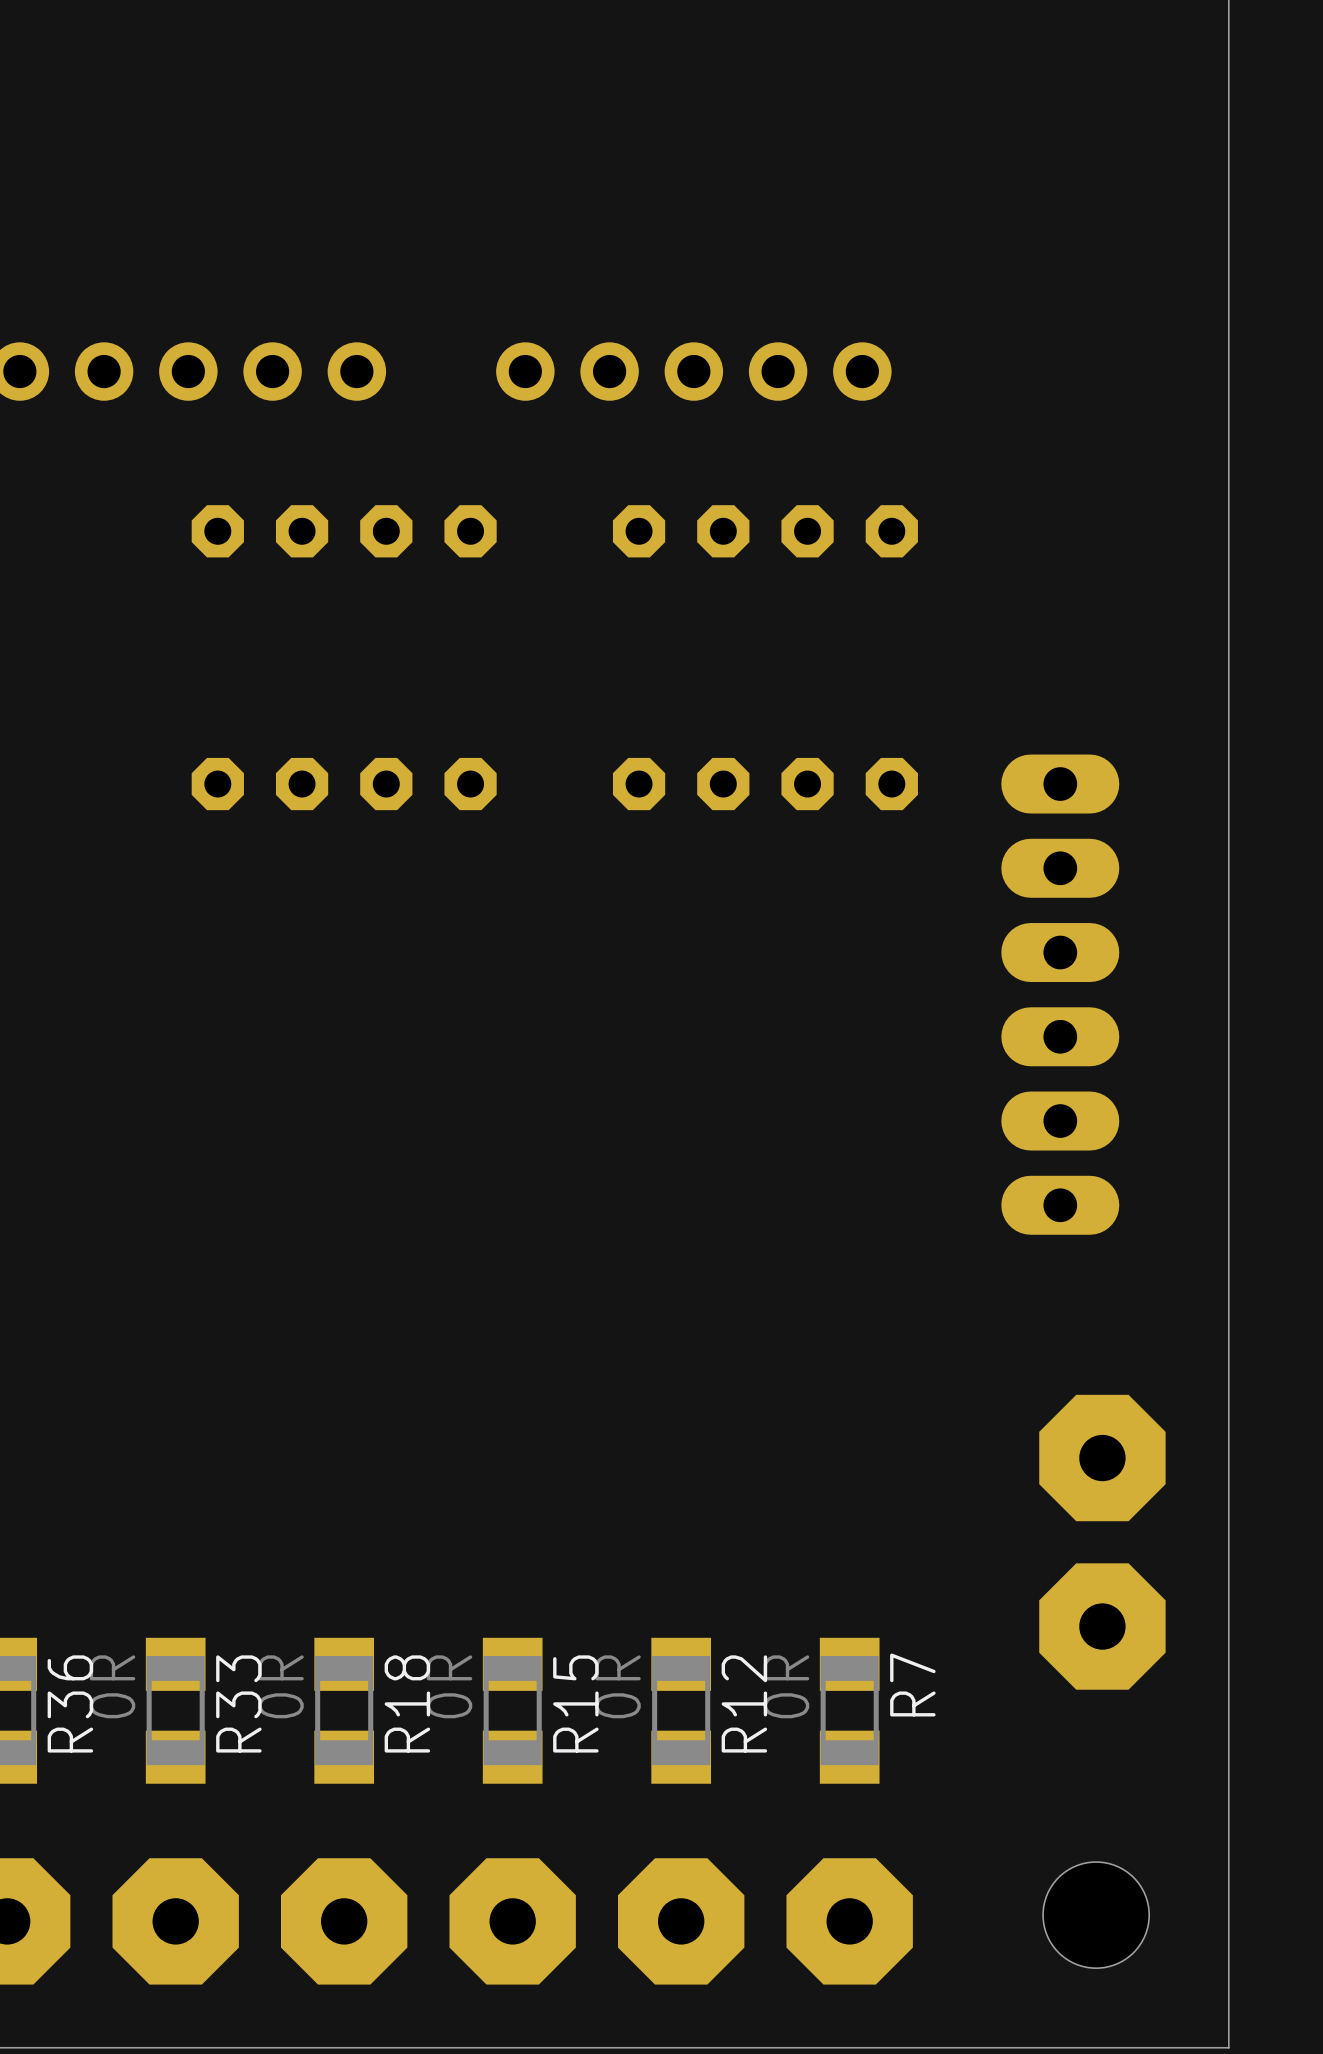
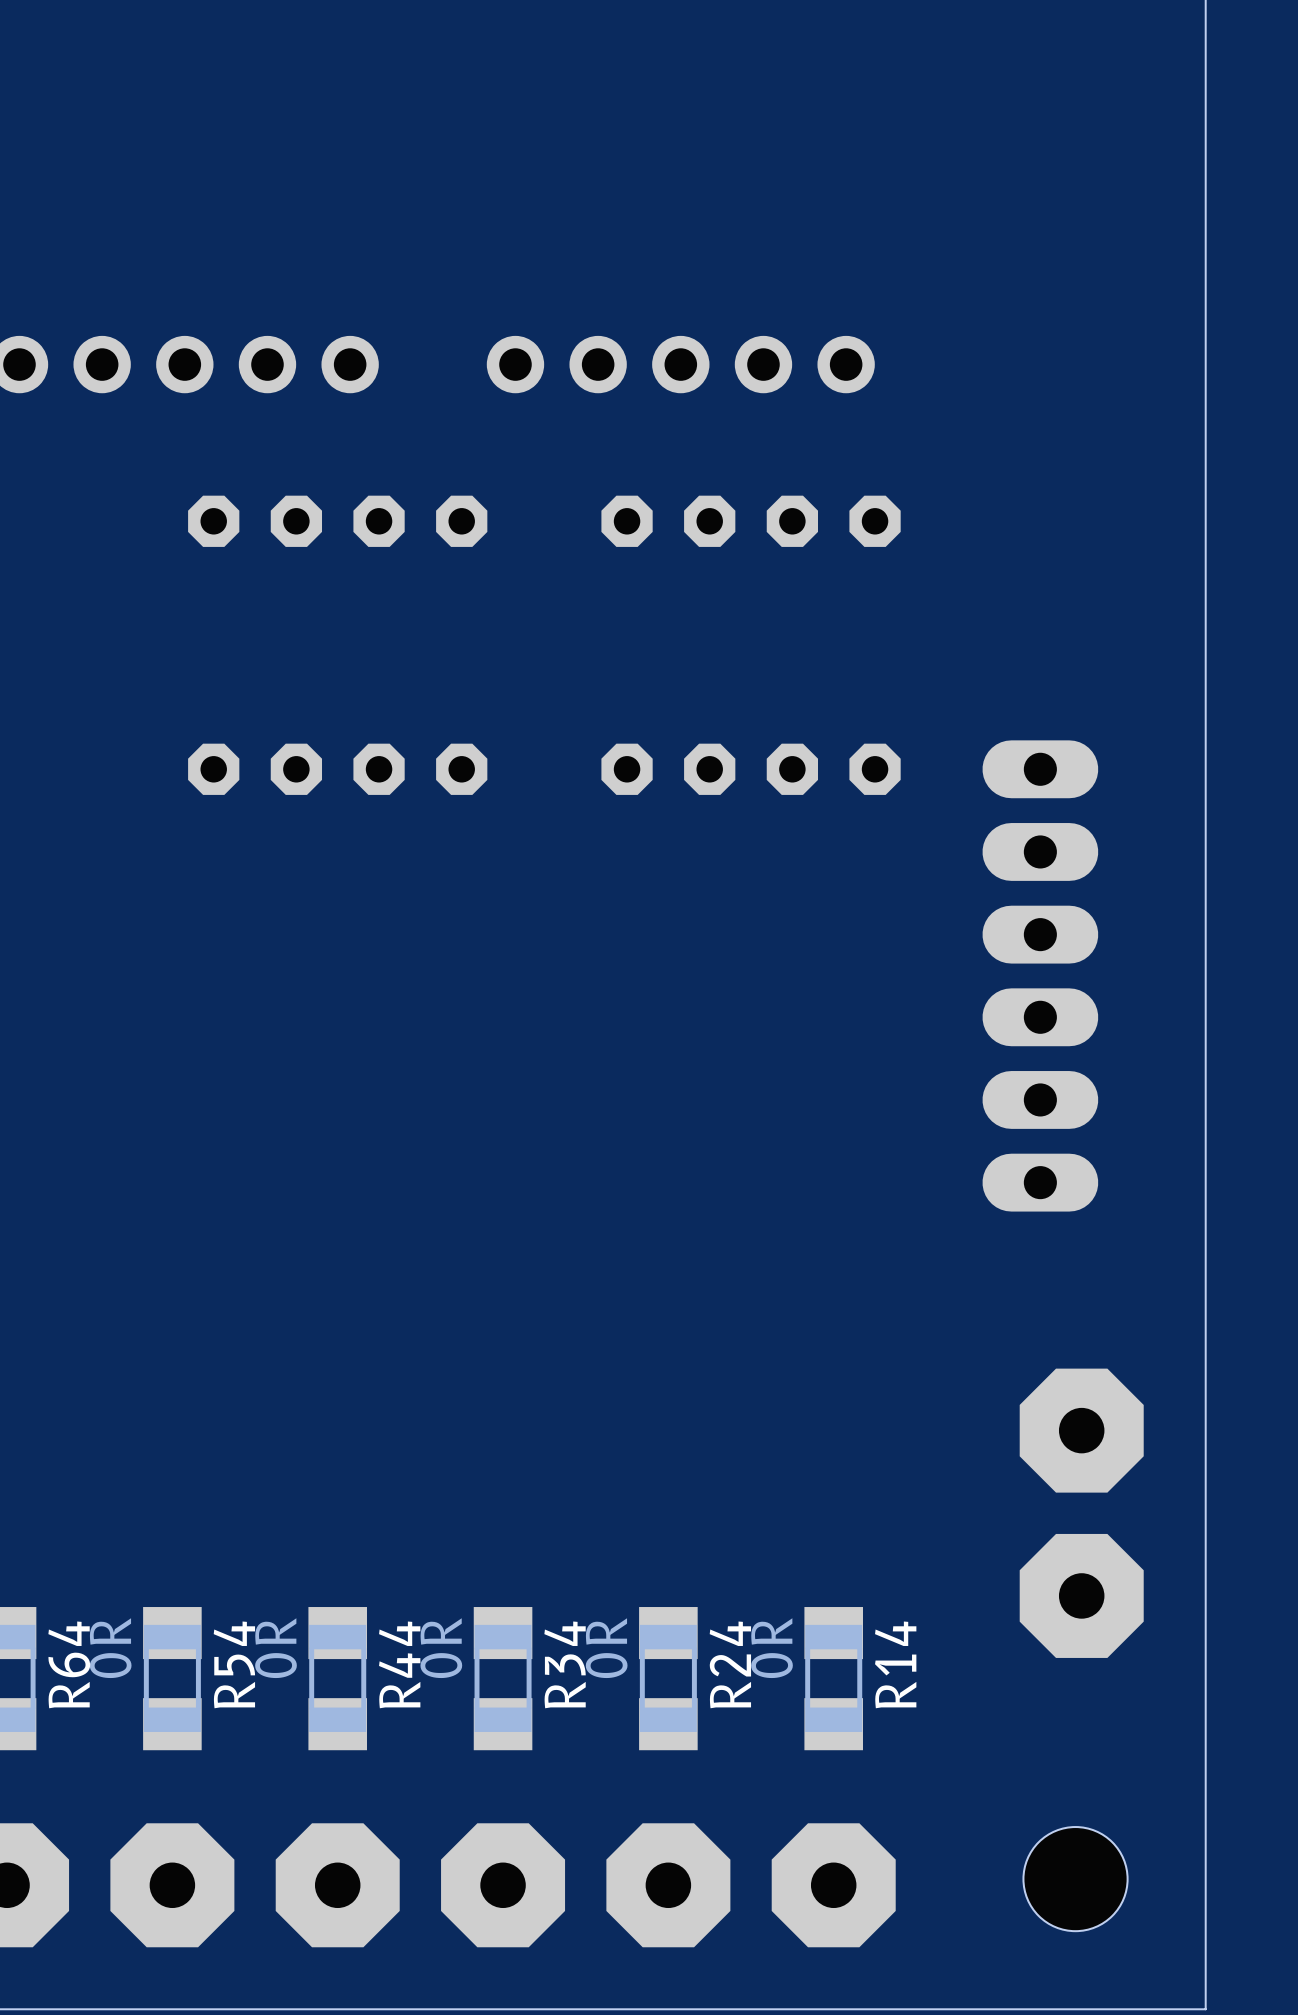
R7 name: R7 (912, 1685) -> R14 (895, 1664)
R36 name: R36 (70, 1703) -> R64 (69, 1664)
R33 name: R33 (238, 1703) -> R54 (234, 1664)
R18 name: R18 (407, 1703) -> R44 (399, 1664)
R15 name: R15 (575, 1703) -> R34 (565, 1664)
R12 name: R12 (744, 1703) -> R24 (730, 1664)

